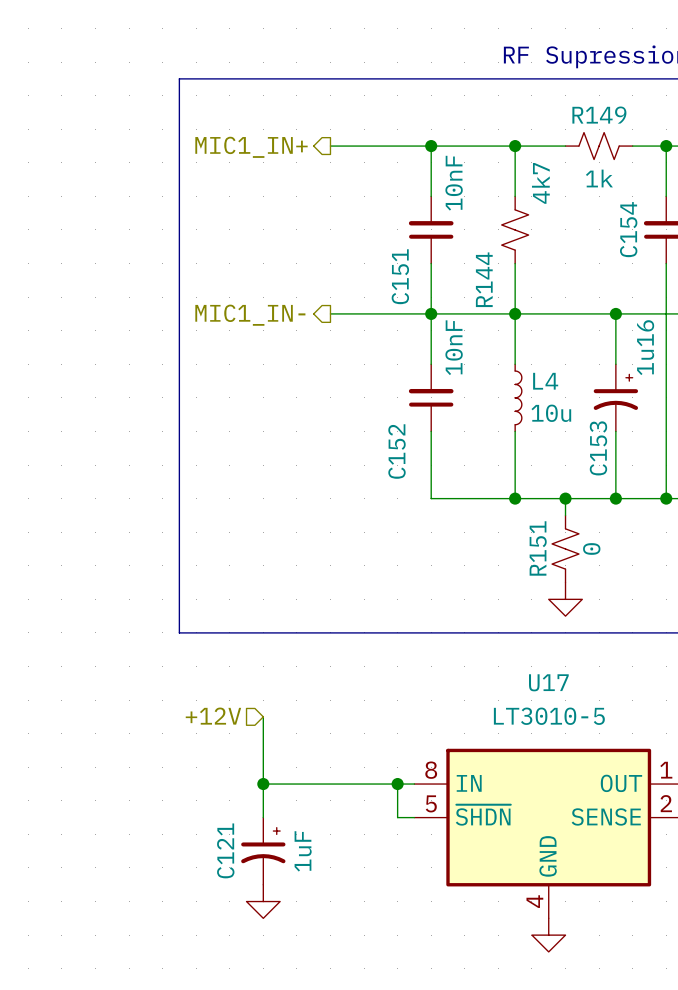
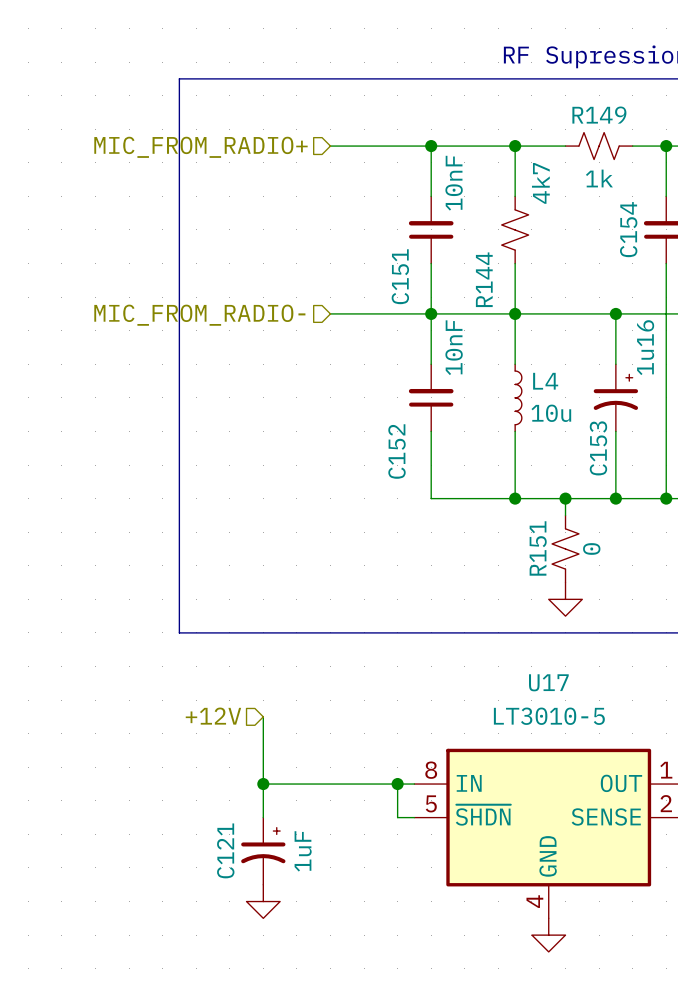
hierarchical label shape: output (251, 147) -> input (200, 147)
hierarchical label: MIC1_IN+ (251, 147) -> MIC_FROM_RADIO+ (200, 147)
hierarchical label shape: output (250, 315) -> input (199, 315)
hierarchical label: MIC1_IN- (250, 315) -> MIC_FROM_RADIO- (199, 315)

